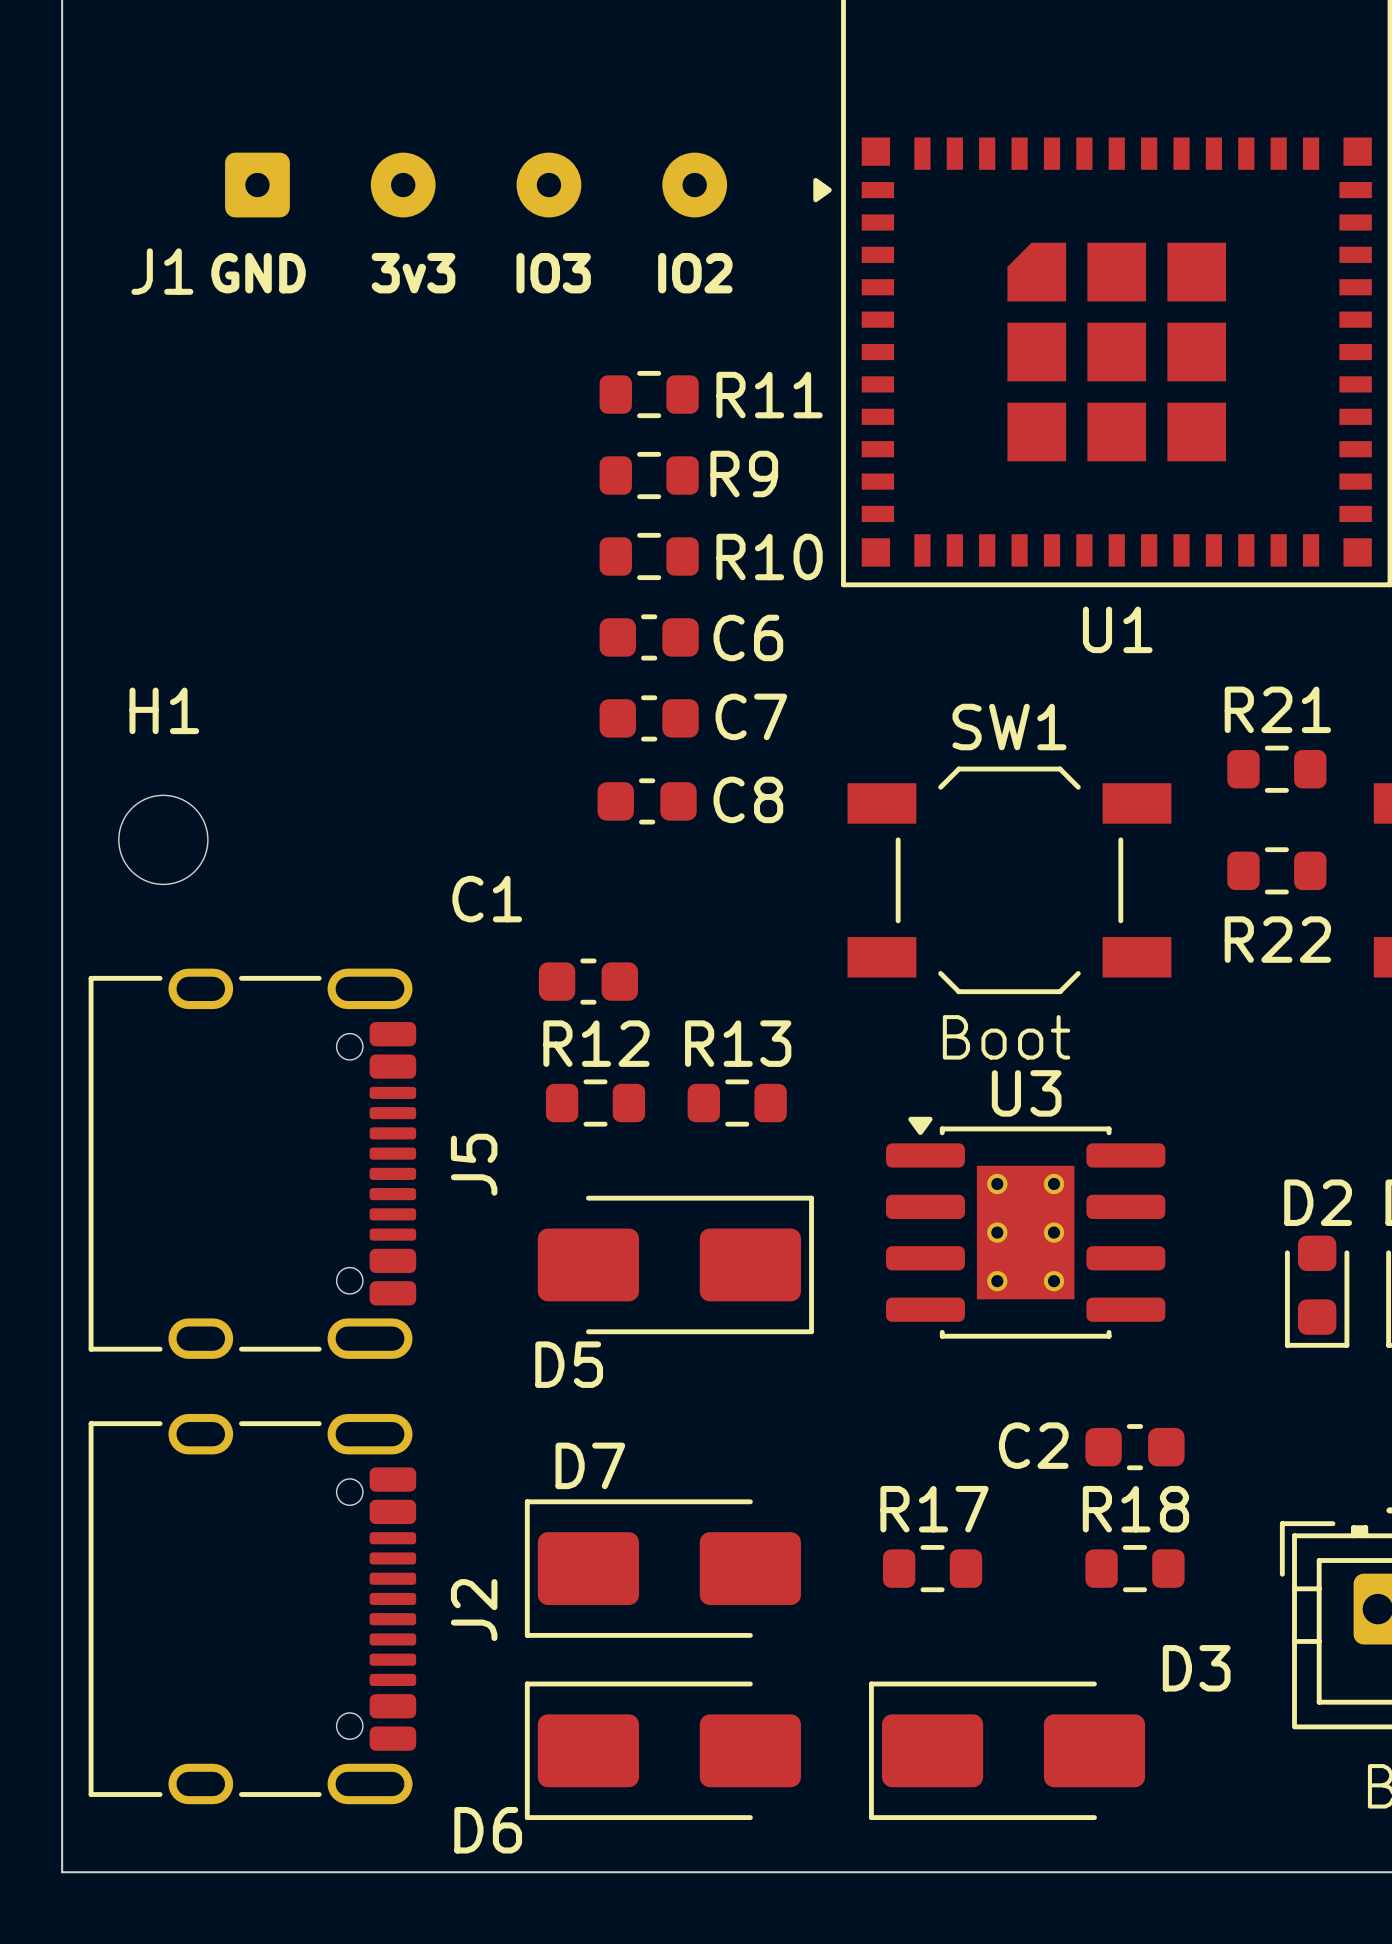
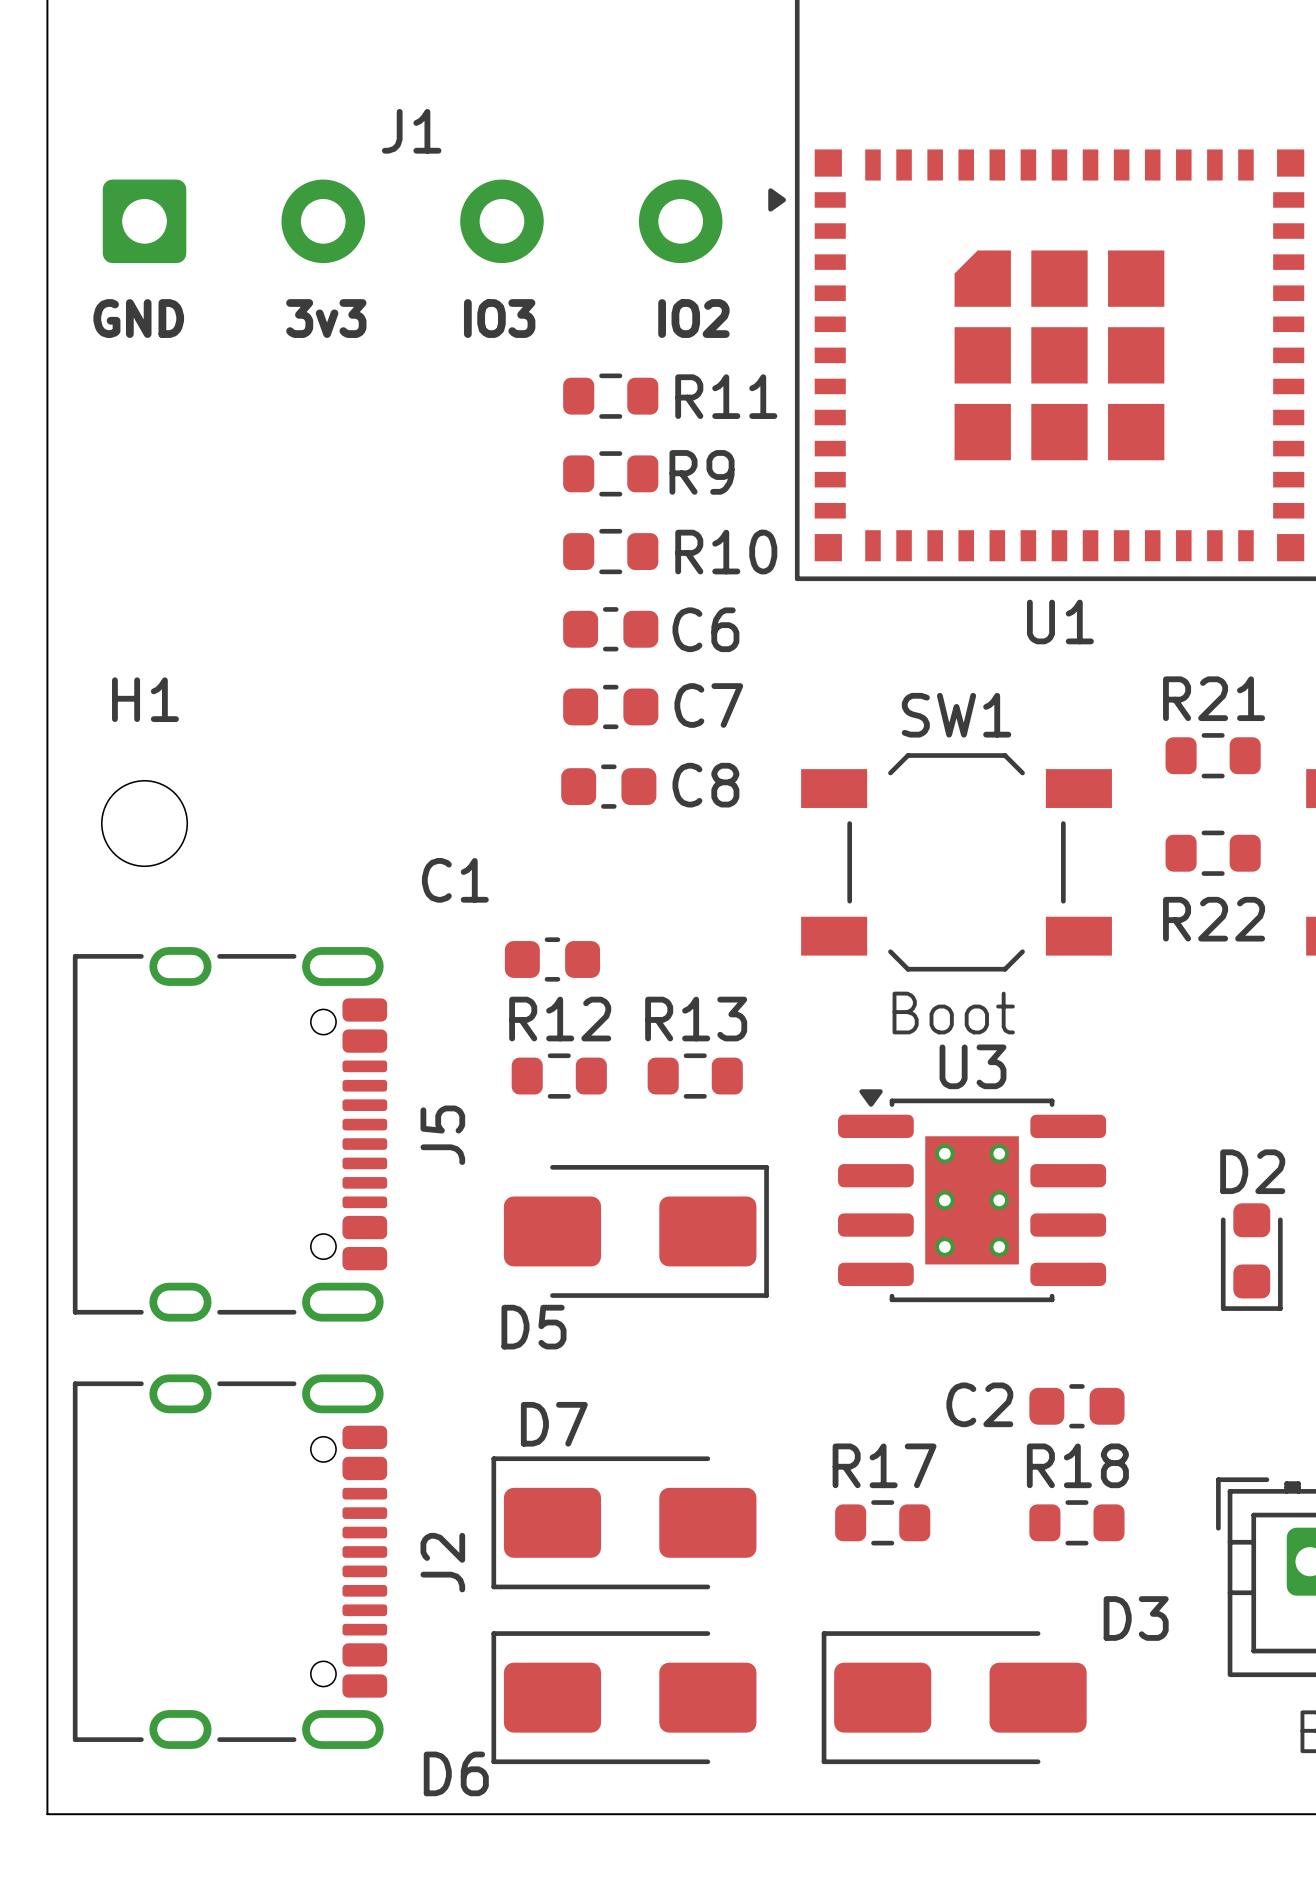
J1 footprint: [225, 152, 728, 218] -> [102, 179, 723, 264]
J1 name position: J1 (162, 271) -> J1 (411, 131)
text position: GND (258, 273) -> GND (138, 318)
text position: 3v3 (413, 273) -> 3v3 (326, 318)
text position: IO3 (553, 273) -> IO3 (499, 318)
text position: IO2 (695, 273) -> IO2 (693, 318)

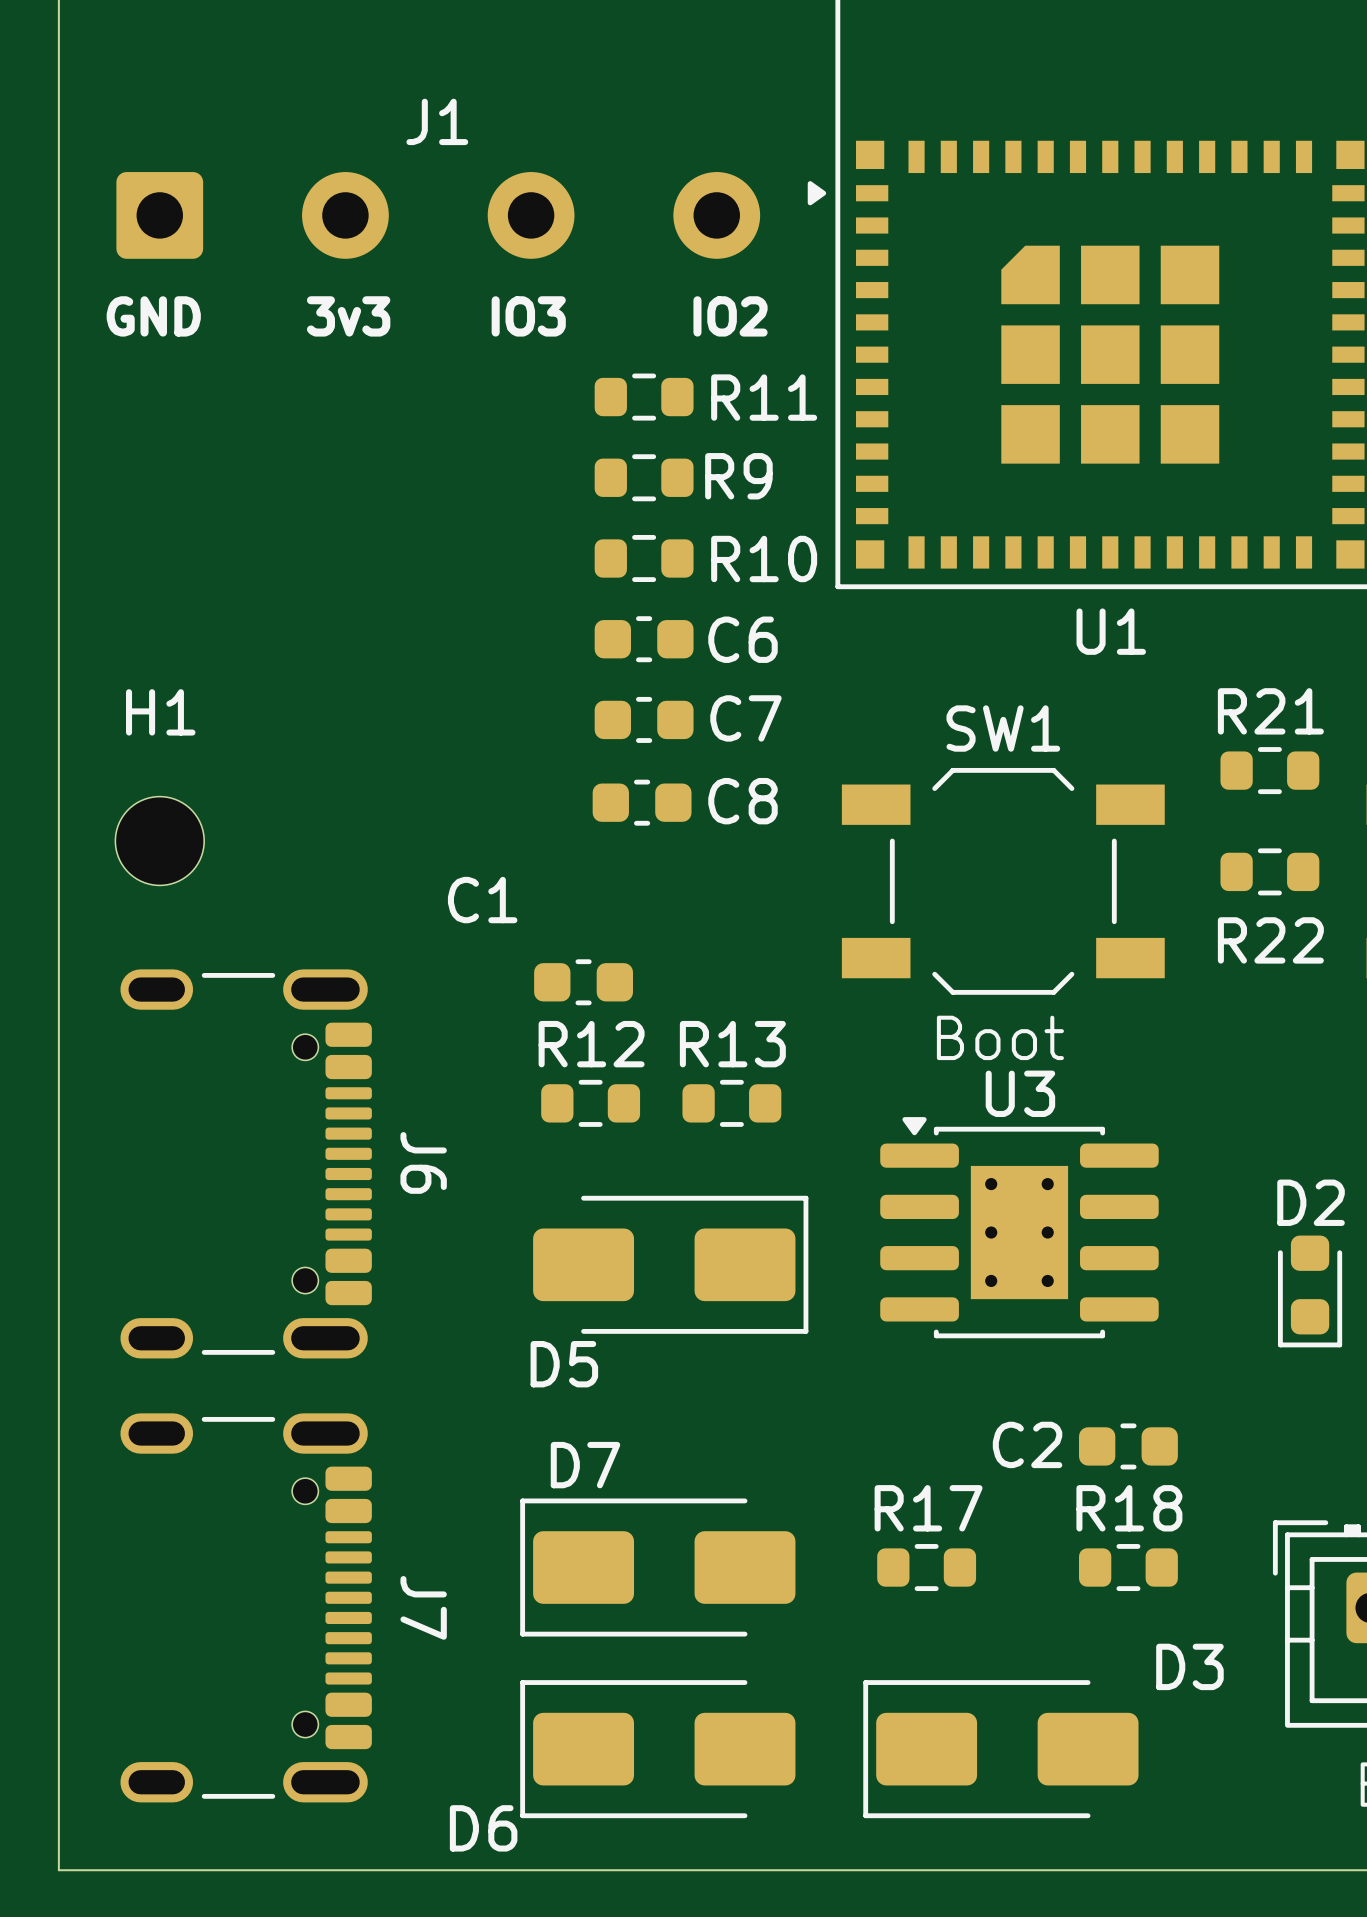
J6: none -> (246, 1163)
J5: (230, 1134) -> none
J7: none -> (246, 1607)
J2: (230, 1561) -> none

